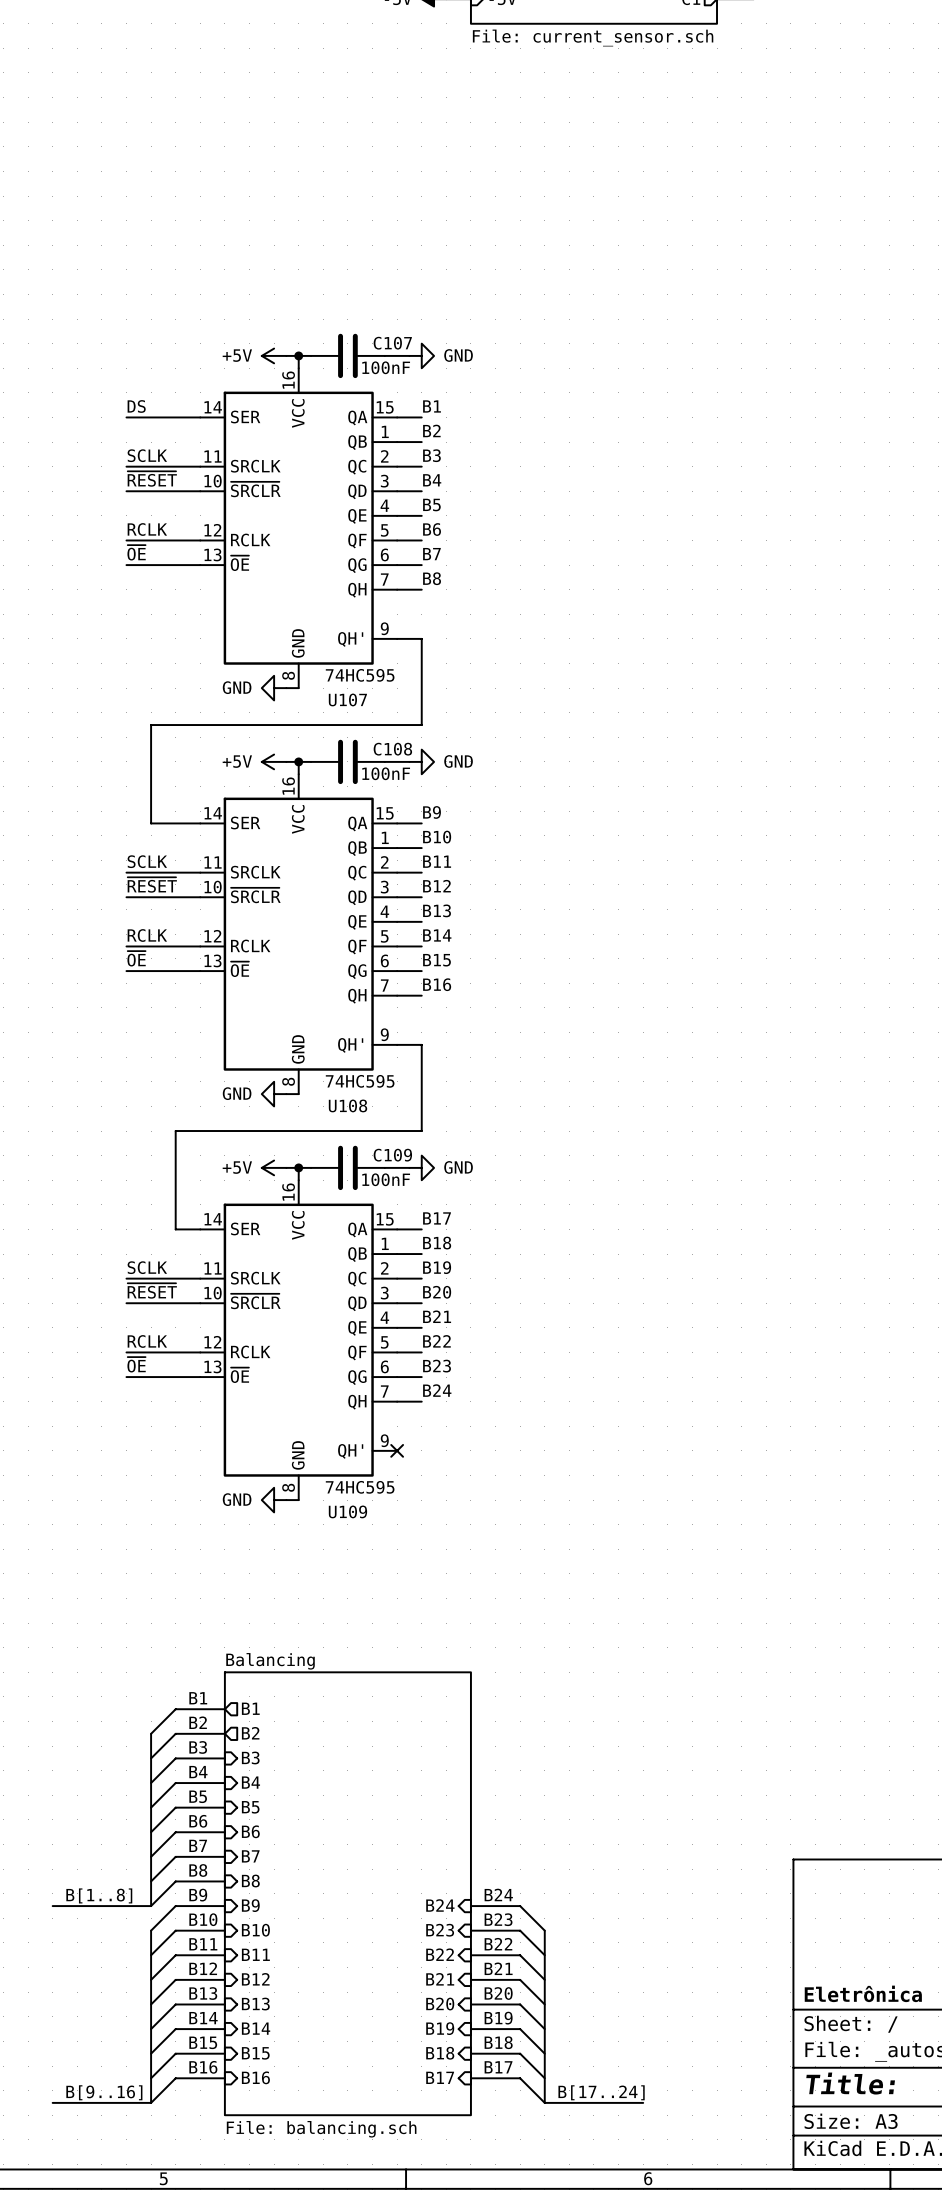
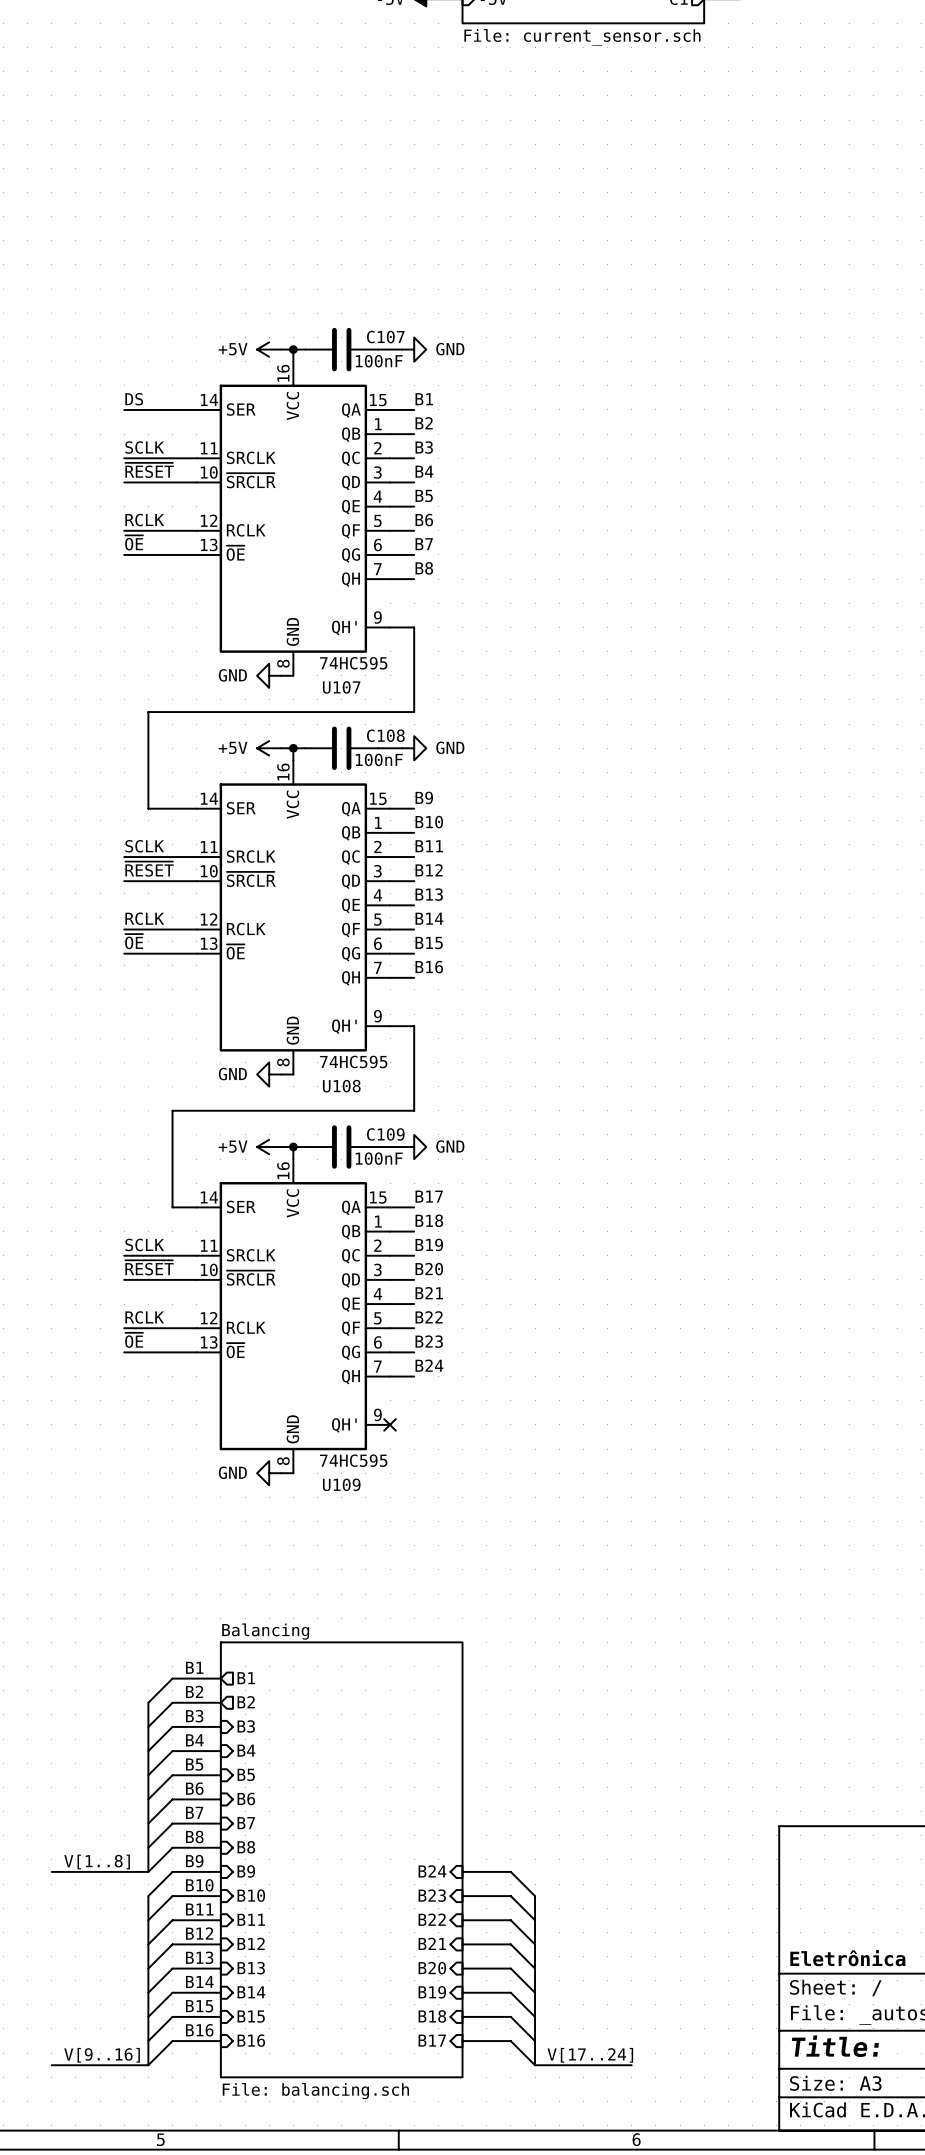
label: B24 (498, 1894) -> none
label: B[1..8] (99, 1895) -> V[1..8] (97, 1861)
label: B23 (498, 1919) -> none
label: B22 (498, 1944) -> none
label: B21 (498, 1968) -> none
label: B20 (498, 1993) -> none
label: B19 (498, 2018) -> none
label: B18 (498, 2042) -> none
label: B17 (498, 2067) -> none
label: B[9..16] (104, 2092) -> V[9..16] (102, 2055)
label: B[17..24] (601, 2092) -> V[17..24] (590, 2055)

